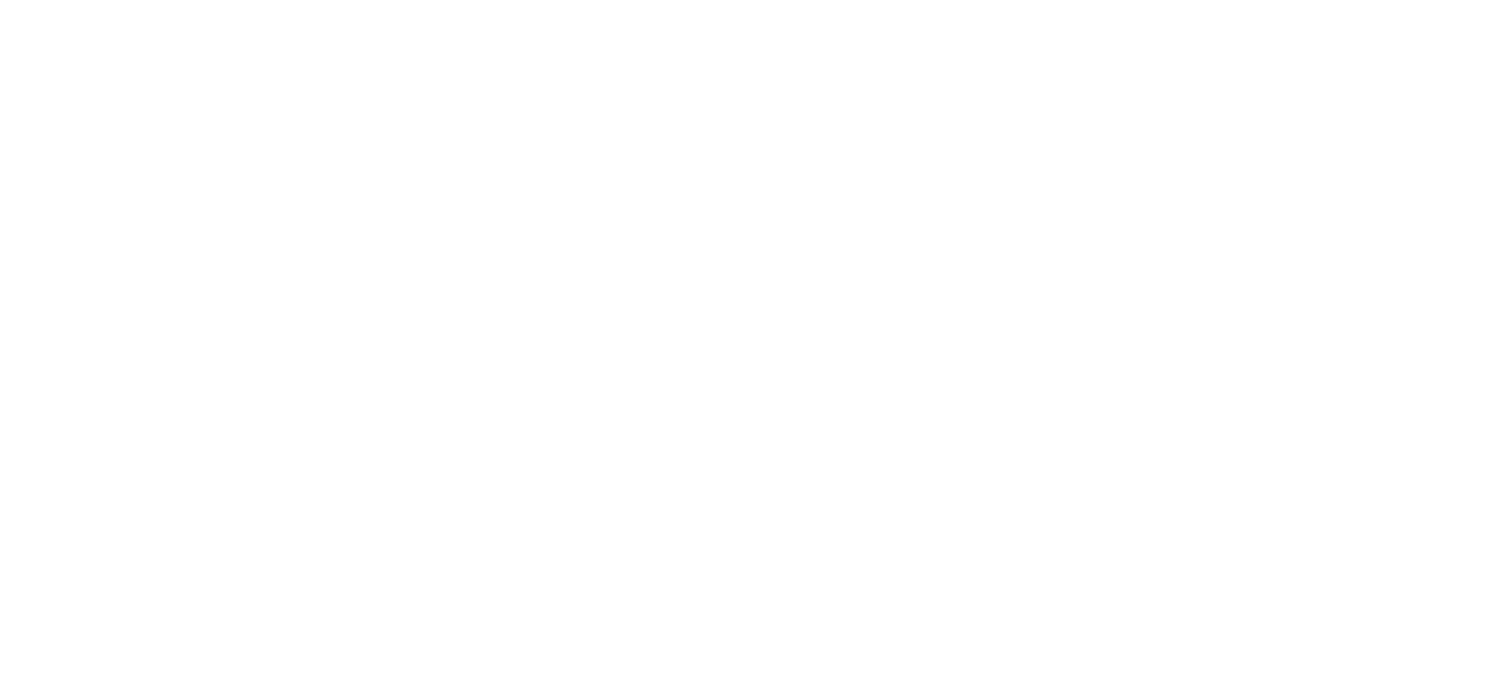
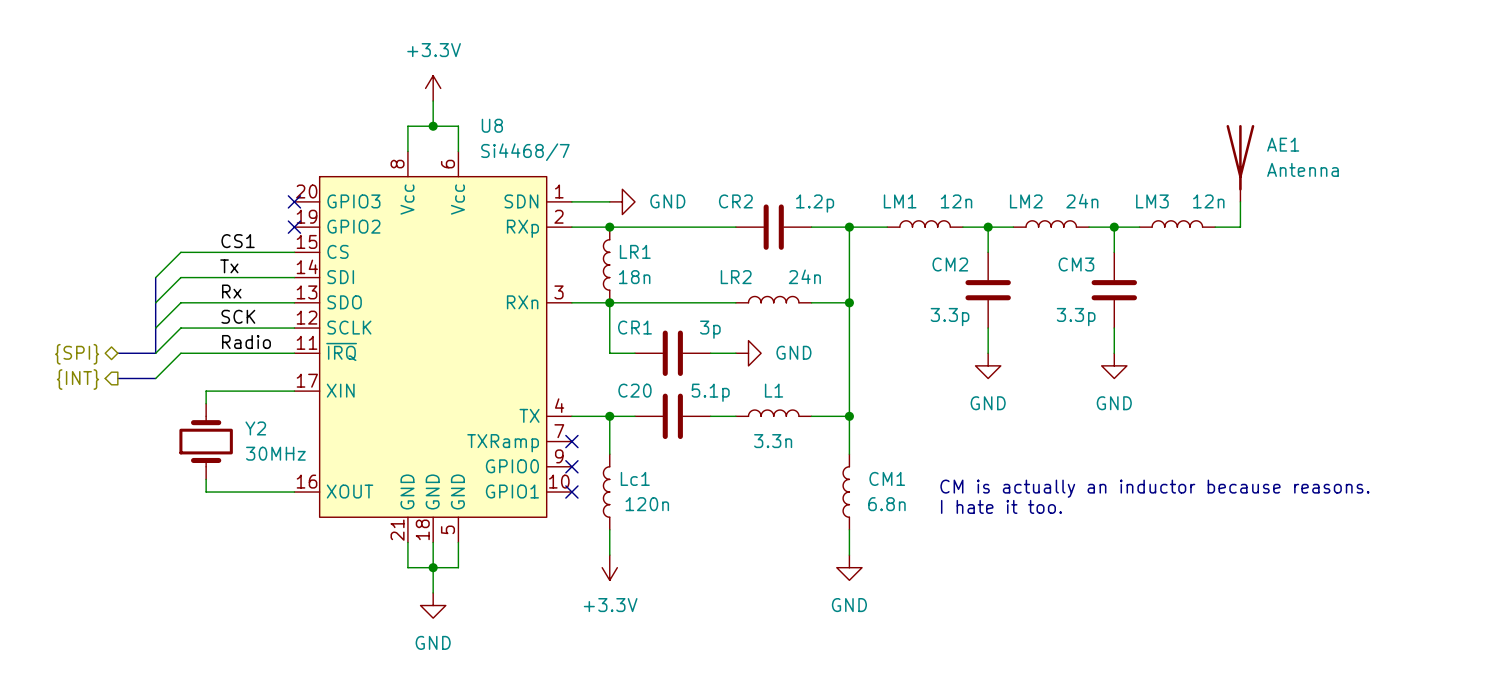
power symbol: none -> +3.3V (433, 88)
wire: none -> (433, 101) (433, 126)
junction: none -> (433, 126)
wire: none -> (407, 151) (407, 126) (458, 126) (458, 151)
AE1: none -> Antenna (1240, 163)
no-connect mark: none -> (294, 201)
wire: none -> (571, 201) (609, 201)
power symbol: none -> GND (622, 201)
wire: none -> (1240, 201) (1240, 227) (1215, 227)
LM1: none -> 12n (925, 223)
LM2: none -> 24n (1051, 223)
LM3: none -> 12n (1177, 223)
no-connect mark: none -> (294, 227)
wire: none -> (571, 227) (735, 227)
junction: none -> (609, 227)
CR2: none -> 1.2p (773, 227)
wire: none -> (811, 227) (887, 227)
wire: none -> (849, 227) (849, 454)
junction: none -> (849, 227)
wire: none -> (962, 227) (1013, 227)
wire: none -> (988, 227) (988, 252)
junction: none -> (988, 227)
wire: none -> (1089, 227) (1139, 227)
wire: none -> (1114, 227) (1114, 252)
junction: none -> (1114, 227)
label: none -> CS1 (238, 241)
wire: none -> (294, 252) (180, 252) (155, 277)
LR1: none -> 18n (606, 264)
label: none -> Tx (229, 266)
bus: none -> (155, 277) (155, 353) (117, 353)
wire: none -> (294, 277) (180, 277) (155, 302)
CM2: none -> 3.3p (988, 290)
CM3: none -> 3.3p (1114, 290)
label: none -> Rx (231, 291)
LR2: none -> 24n (773, 299)
wire: none -> (294, 302) (180, 302) (155, 328)
wire: none -> (571, 302) (735, 302)
wire: none -> (609, 302) (609, 353) (634, 353)
junction: none -> (609, 302)
wire: none -> (811, 302) (849, 302)
junction: none -> (849, 302)
label: none -> SCK (238, 316)
wire: none -> (294, 328) (180, 328) (155, 353)
wire: none -> (988, 328) (988, 353)
wire: none -> (1114, 328) (1114, 353)
label: none -> Radio (246, 342)
U8: none -> Si4468/7 (433, 346)
wire: none -> (294, 353) (180, 353) (155, 378)
CR1: none -> 3p (672, 353)
wire: none -> (710, 353) (735, 353)
power symbol: none -> GND (748, 353)
hierarchical label: none -> {SPI} (77, 354)
power symbol: none -> GND (988, 365)
power symbol: none -> GND (1114, 365)
bus: none -> (117, 378) (155, 378)
hierarchical label: none -> {INT} (78, 379)
wire: none -> (294, 391) (206, 391) (206, 403)
L1: none -> 3.3n (773, 413)
wire: none -> (571, 416) (634, 416)
wire: none -> (609, 416) (609, 454)
junction: none -> (609, 416)
C20: none -> 5.1p (672, 416)
wire: none -> (710, 416) (735, 416)
wire: none -> (811, 416) (849, 416)
junction: none -> (849, 416)
Y2: none -> 30MHz (206, 441)
no-connect mark: none -> (571, 441)
no-connect mark: none -> (571, 466)
wire: none -> (206, 479) (206, 492) (294, 492)
text: none -> CM is actually an inductor because reasons. (1154, 488)
no-connect mark: none -> (571, 492)
Lc1: none -> 120n (606, 492)
CM1: none -> 6.8n (846, 492)
text: none -> I hate it too. (1001, 506)
wire: none -> (609, 529) (609, 555)
wire: none -> (849, 529) (849, 555)
wire: none -> (407, 542) (407, 567) (458, 567) (458, 542)
wire: none -> (433, 542) (433, 592)
junction: none -> (433, 567)
power symbol: none -> +3.3V (609, 567)
power symbol: none -> GND (849, 567)
power symbol: none -> GND (433, 605)

